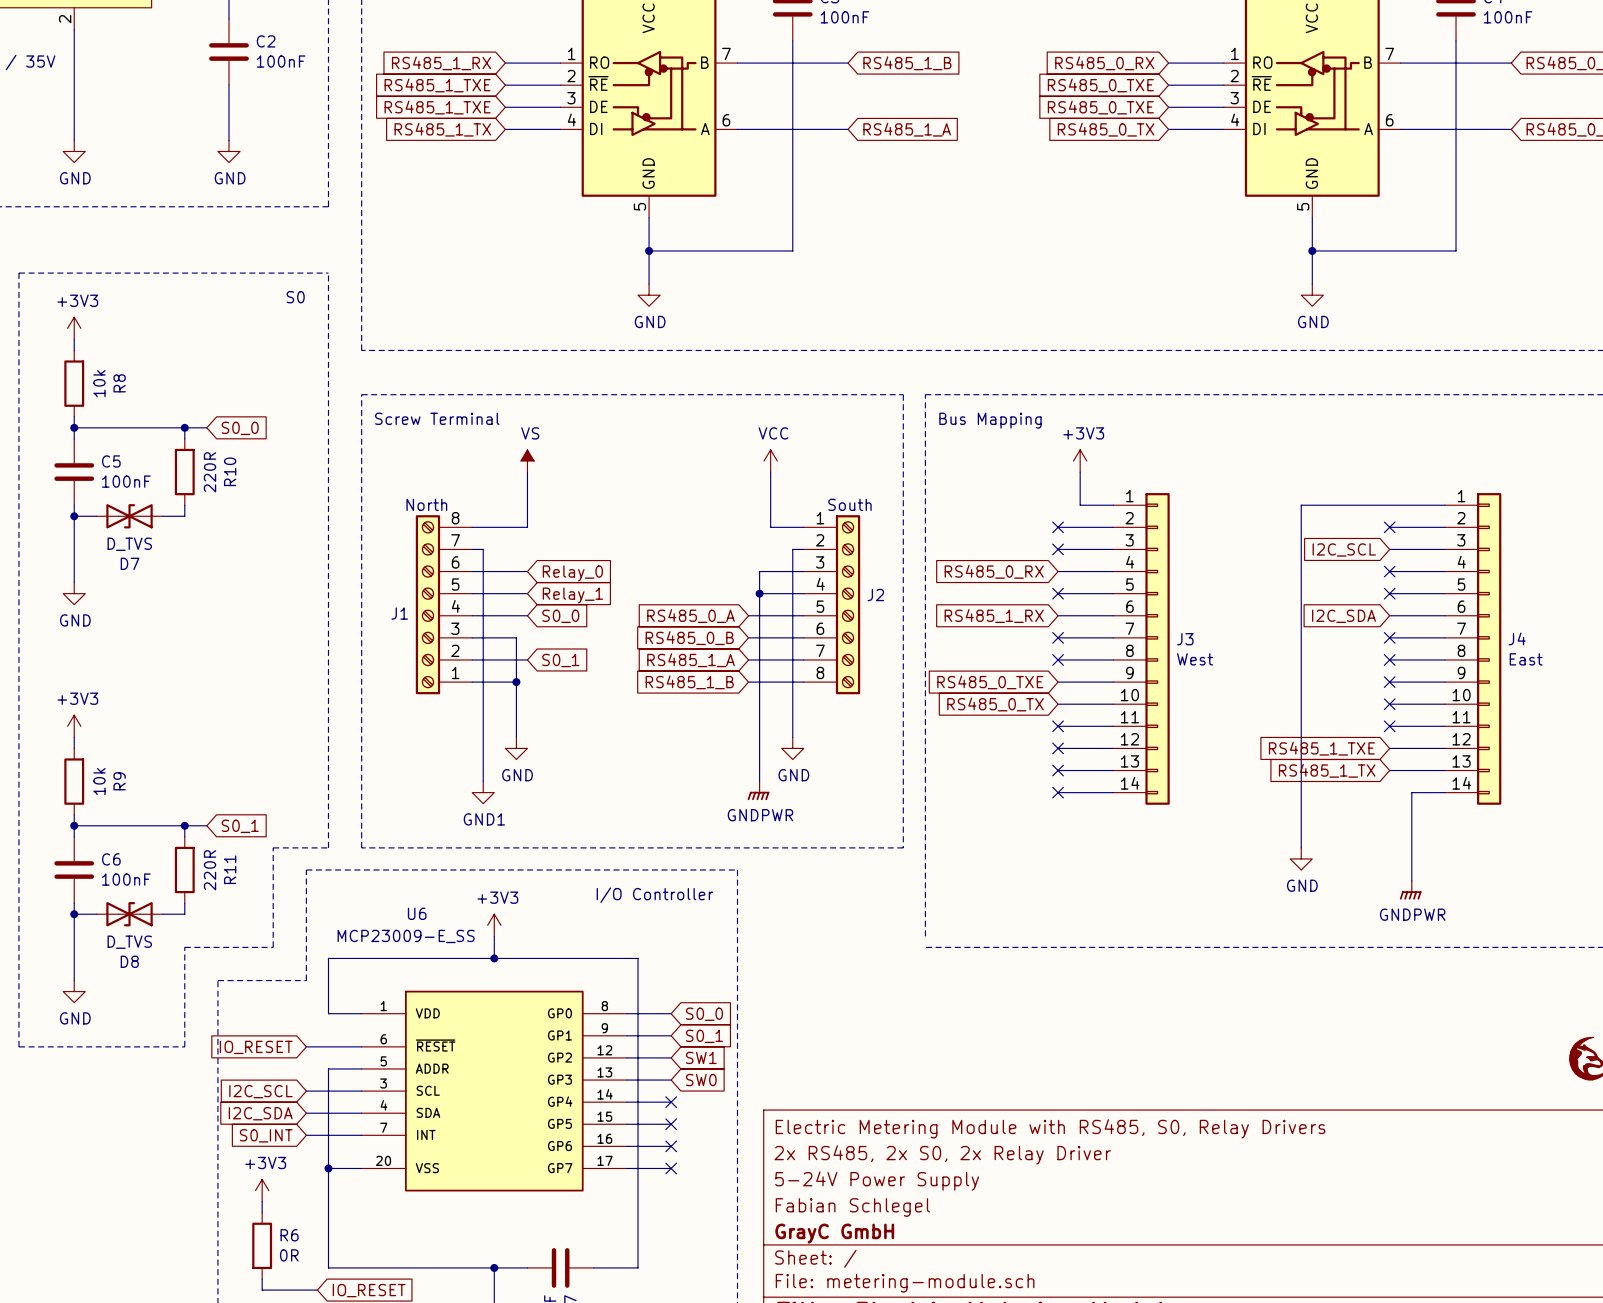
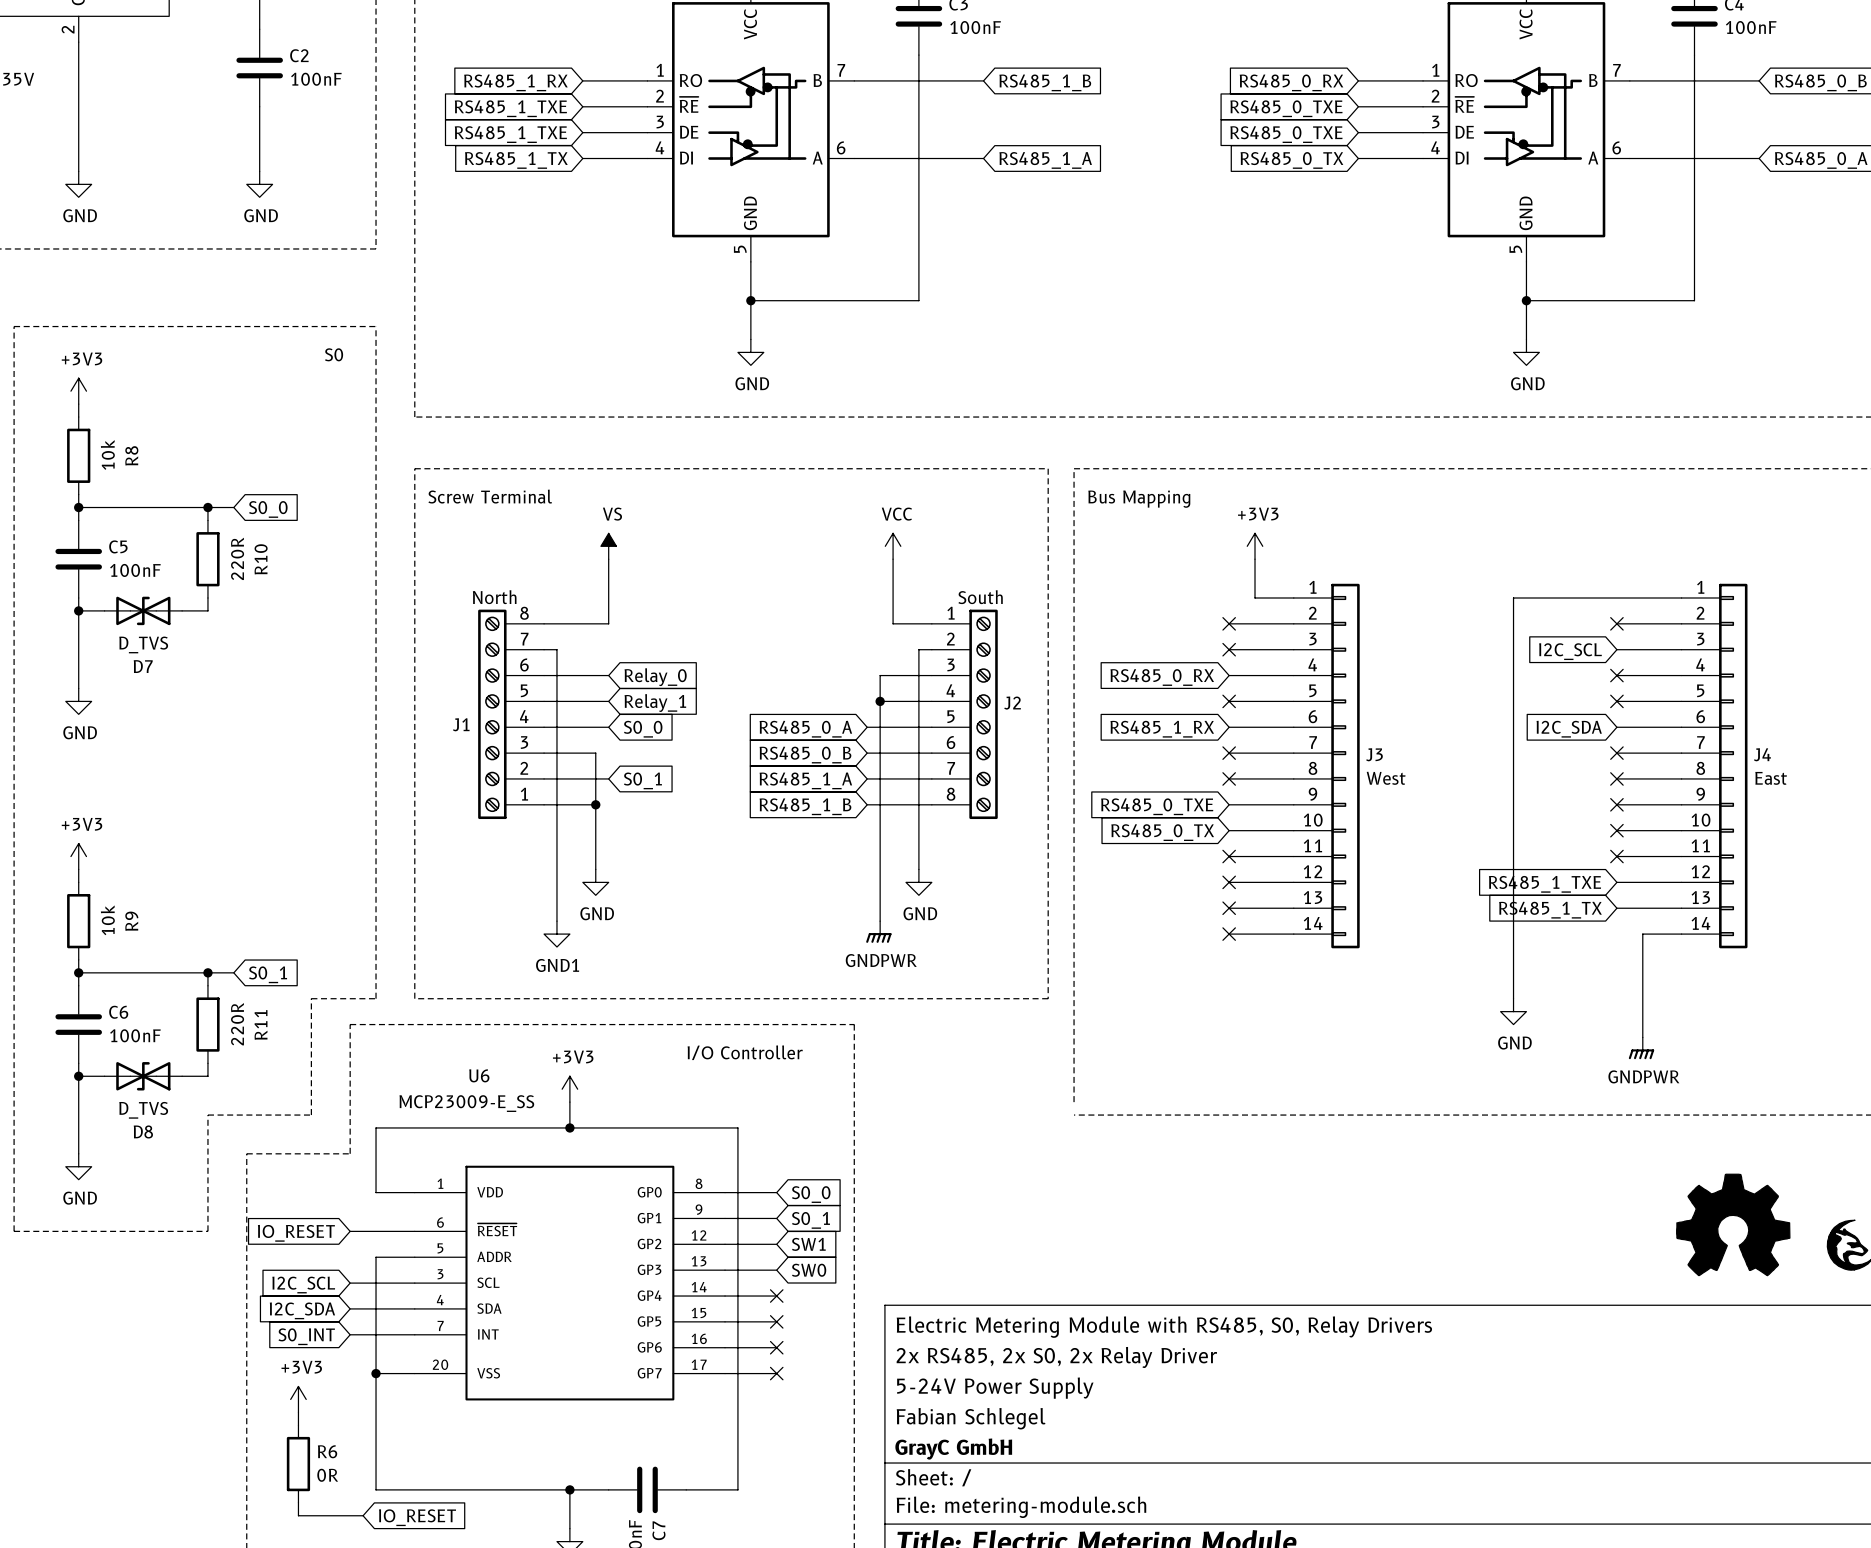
part: none -> (1733, 1224)

